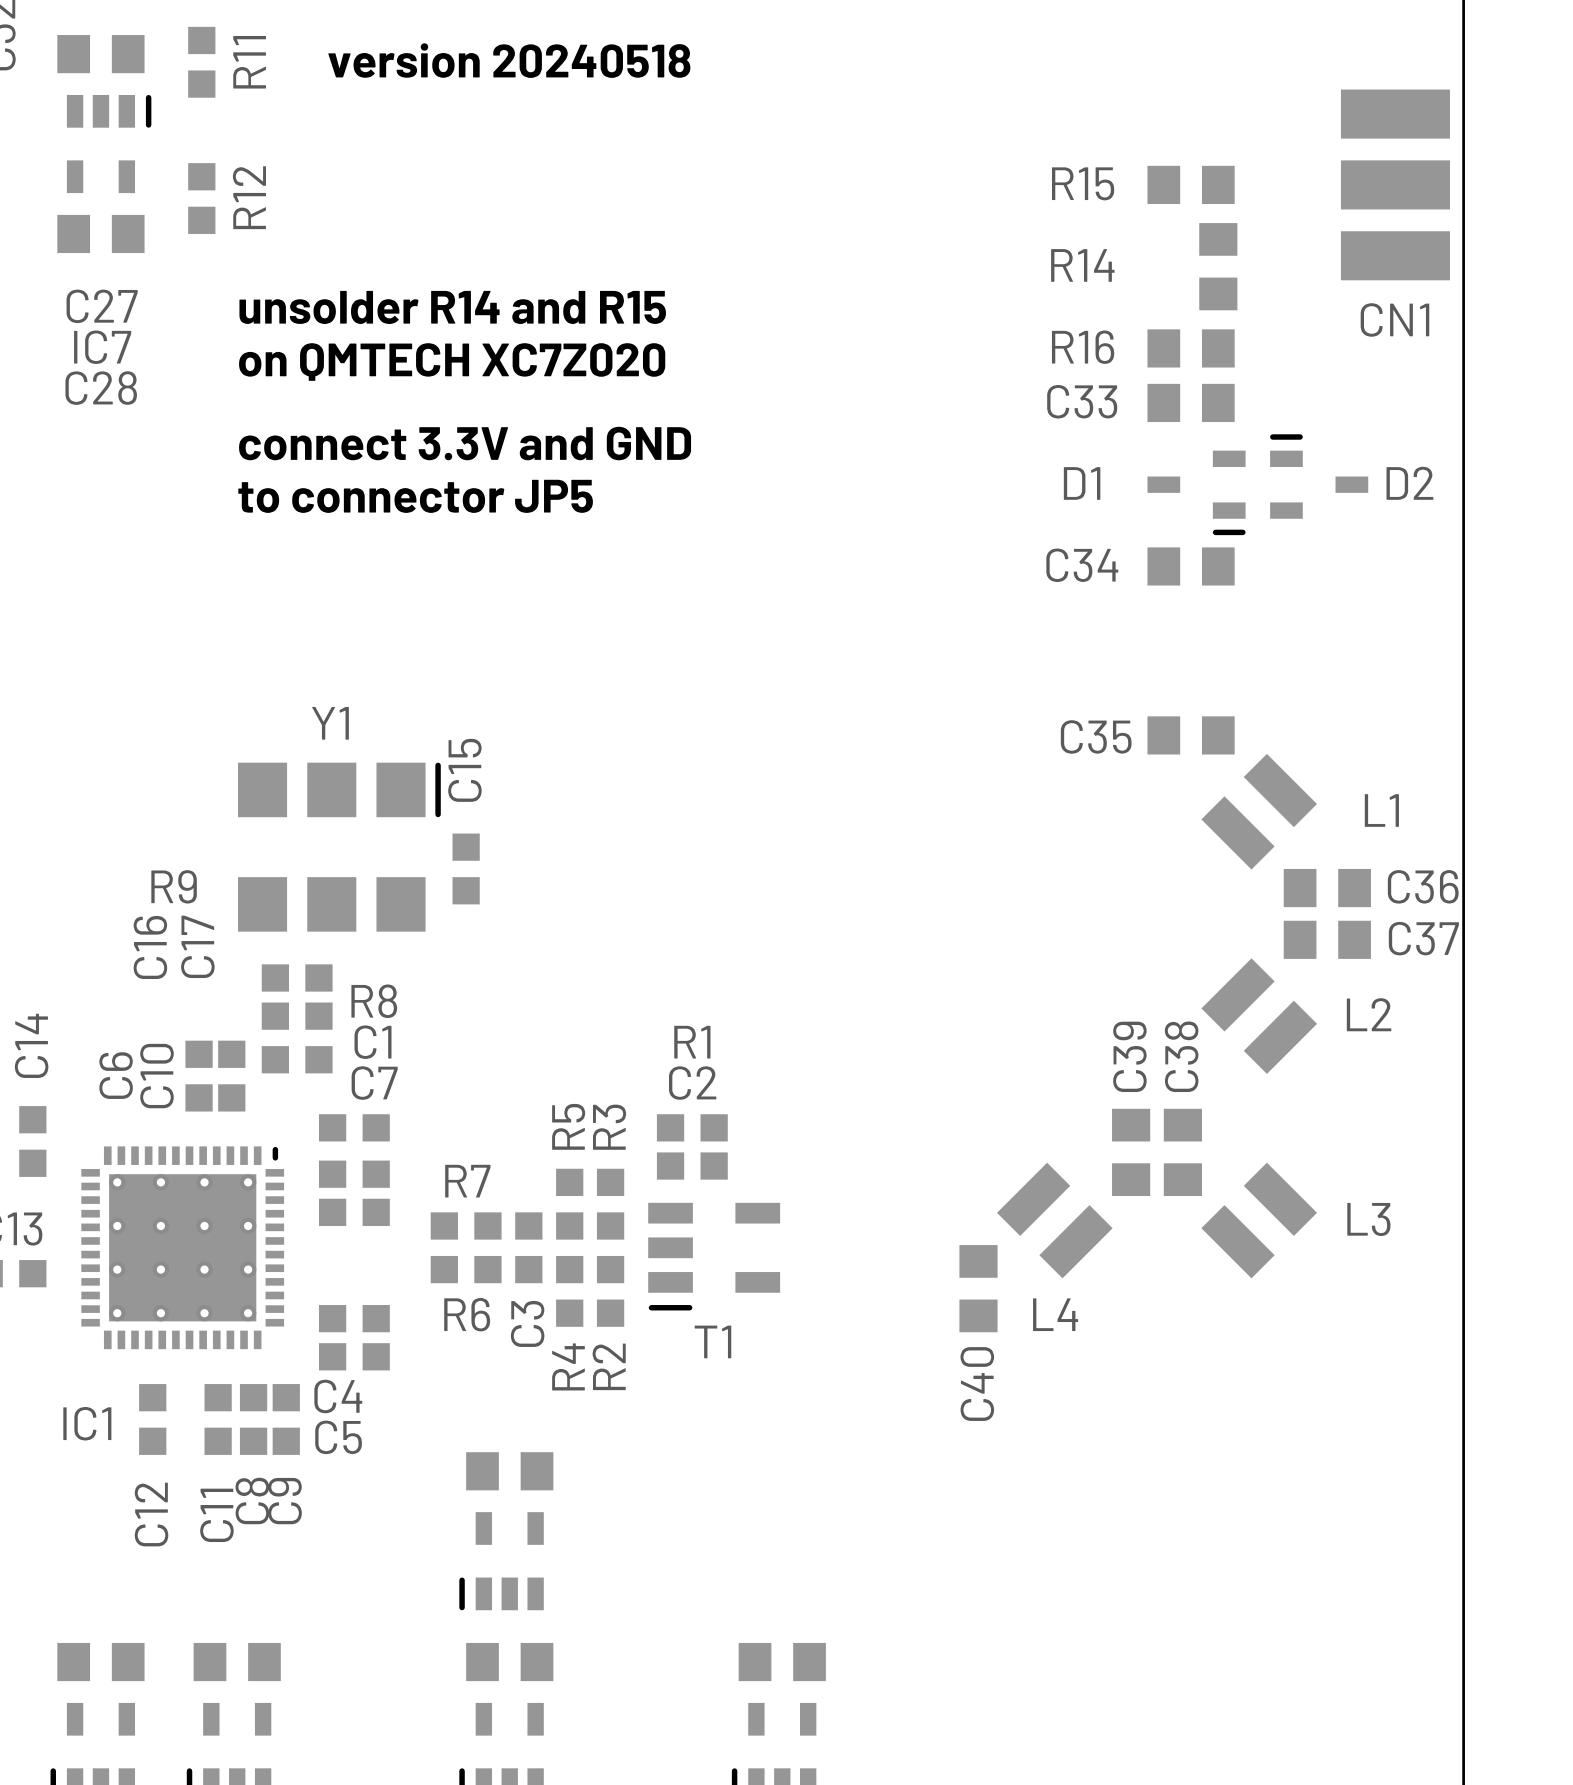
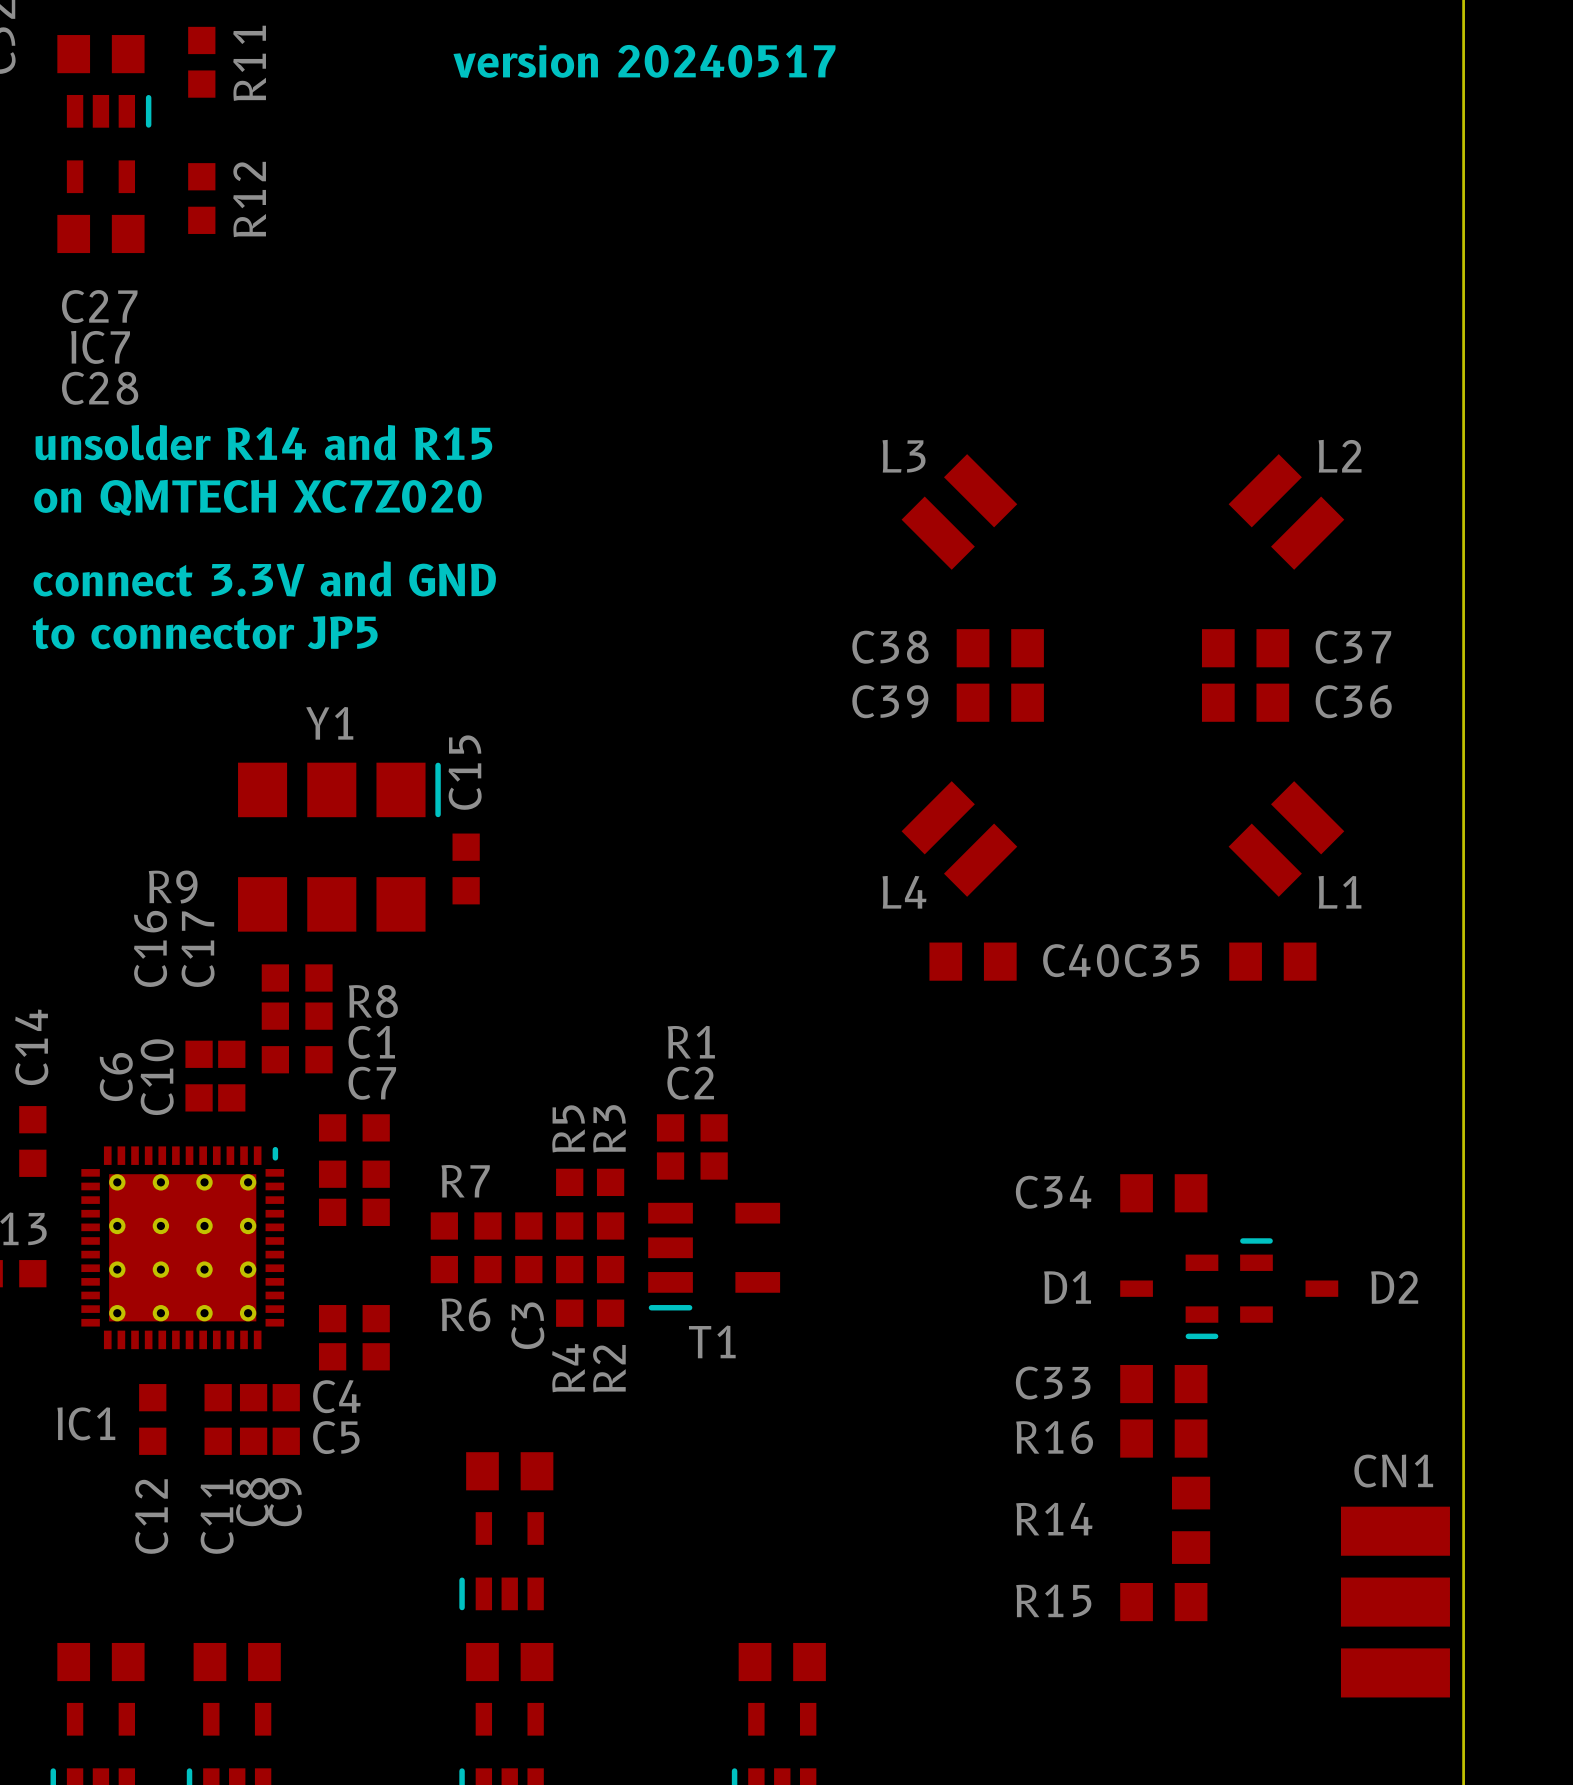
text: version 20240518 (509, 60) -> version 20240517 (644, 61)
R15 position: (1191, 184) -> (1163, 1602)
CN1 position: (1395, 184) -> (1395, 1602)
R14 position: (1218, 266) -> (1191, 1520)
text position: unsolder R14 and R15 (452, 307) -> unsolder R14 and R15 (263, 442)
CN1 name position: CN1 (1394, 319) -> CN1 (1393, 1471)
R16 position: (1191, 348) -> (1163, 1438)
text position: on QMTECH XC7Z020 (452, 362) -> on QMTECH XC7Z020 (257, 497)
C33 position: (1191, 402) -> (1163, 1384)
text position: connect 3.3V and GND (465, 443) -> connect 3.3V and GND (264, 578)
D2 position: (1319, 476) -> (1289, 1280)
D1 name position: D1 (1082, 483) -> D1 (1067, 1287)
D2 name position: D2 (1409, 483) -> D2 (1394, 1287)
D1 position: (1196, 492) -> (1169, 1296)
text position: to connector JP5 (415, 496) -> to connector JP5 (205, 632)
C34 position: (1191, 566) -> (1163, 1193)
C35 position: (1191, 735) -> (1272, 961)
C35 name position: C35 (1096, 736) -> C35 (1162, 960)
L1 name position: L1 (1381, 810) -> L1 (1339, 892)
L1 position: (1259, 811) -> (1286, 838)
C36 name position: C36 (1423, 886) -> C36 (1353, 701)
C36 position: (1327, 888) -> (1245, 702)
C37 name position: C37 (1423, 938) -> C37 (1353, 647)
C37 position: (1327, 939) -> (1245, 648)
L2 name position: L2 (1369, 1014) -> L2 (1340, 456)
L2 position: (1259, 1016) -> (1286, 511)
C39 name position: C39 (1129, 1056) -> C39 (890, 701)
C38 name position: C38 (1181, 1056) -> C38 (890, 647)
C39 rotation: 0° (1131, 1152) -> 90° clockwise (1000, 702)
C39 position: (1131, 1152) -> (1000, 702)
C38 rotation: 0° (1182, 1152) -> 90° clockwise (1000, 648)
C38 position: (1182, 1152) -> (1000, 648)
L3 name position: L3 (1368, 1219) -> L3 (904, 456)
L4 position: (1054, 1220) -> (959, 838)
L3 position: (1259, 1220) -> (959, 511)
C40 rotation: 0° (978, 1288) -> 90° clockwise (973, 961)
C40 position: (978, 1288) -> (973, 961)
L4 name position: L4 (1055, 1314) -> L4 (904, 892)
C40 name position: C40 (977, 1384) -> C40 (1080, 960)

